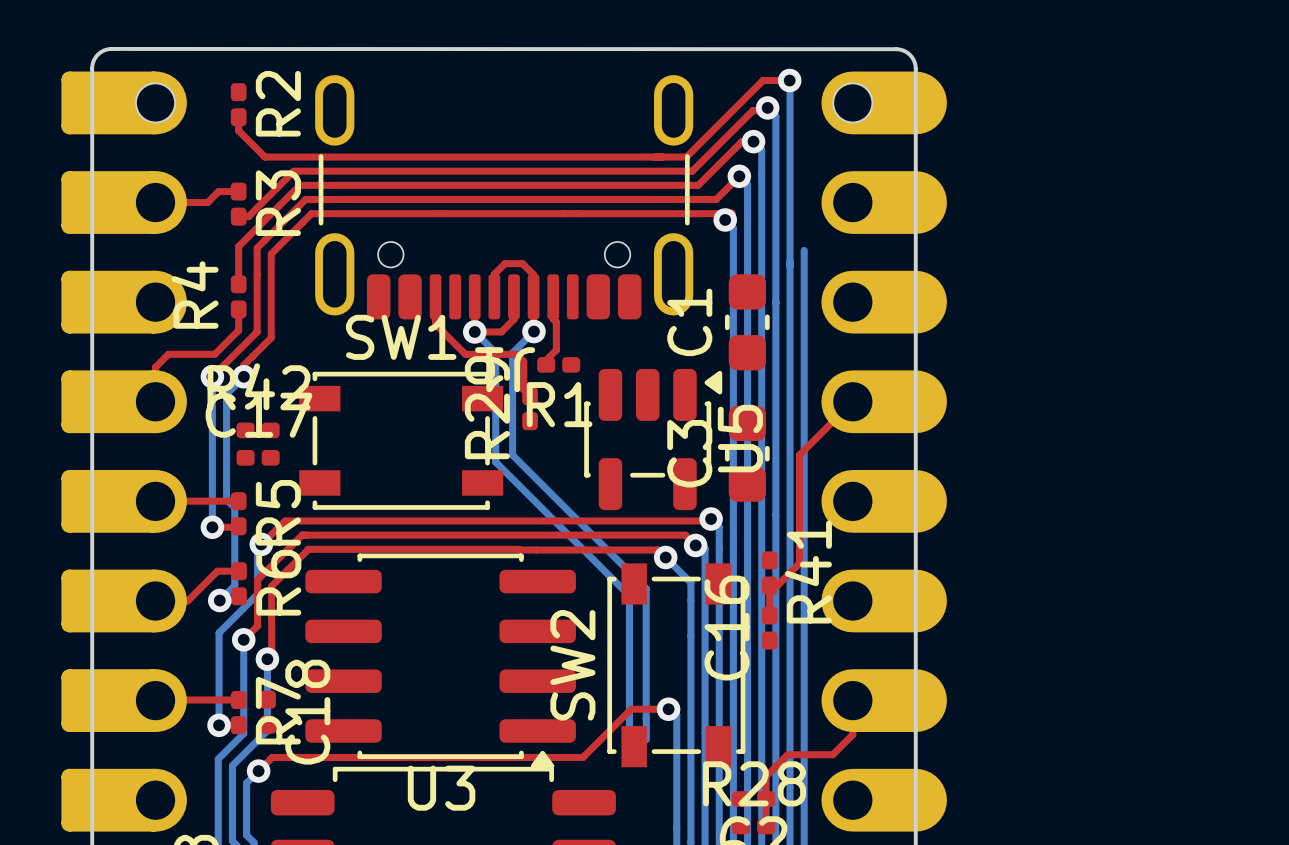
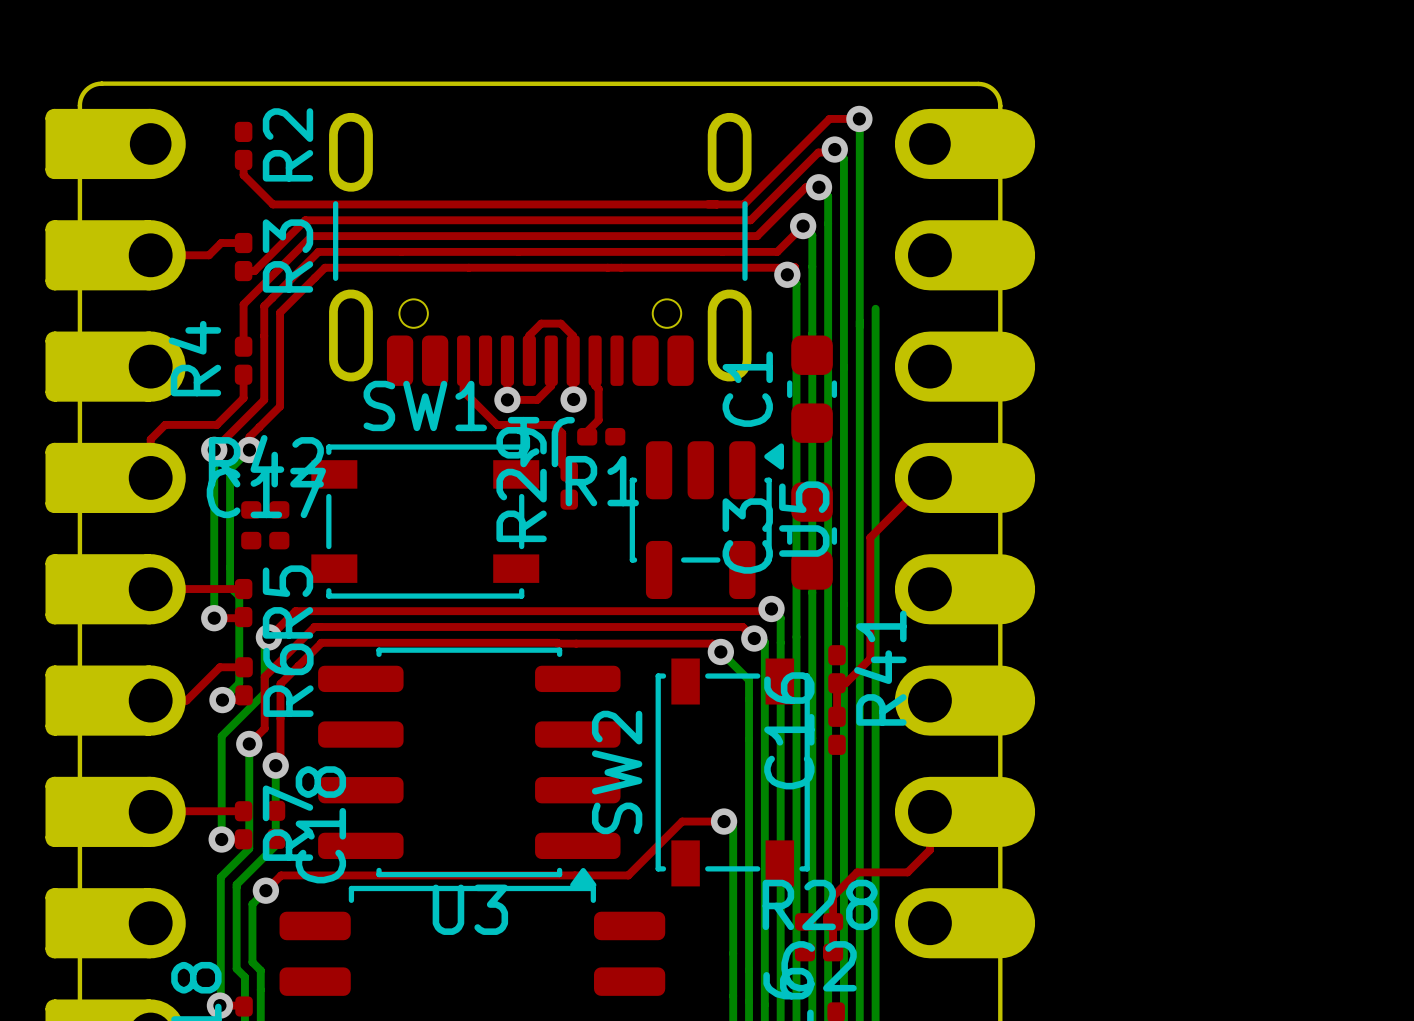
bottom track: (474, 331) (495, 352) (495, 462) (629, 595) (629, 739) -> none
bottom track: (533, 331) (512, 352) (512, 455) (646, 588) -> none
bottom track: (646, 589) (646, 718) -> none
bottom track: (646, 718) (646, 739) -> none

